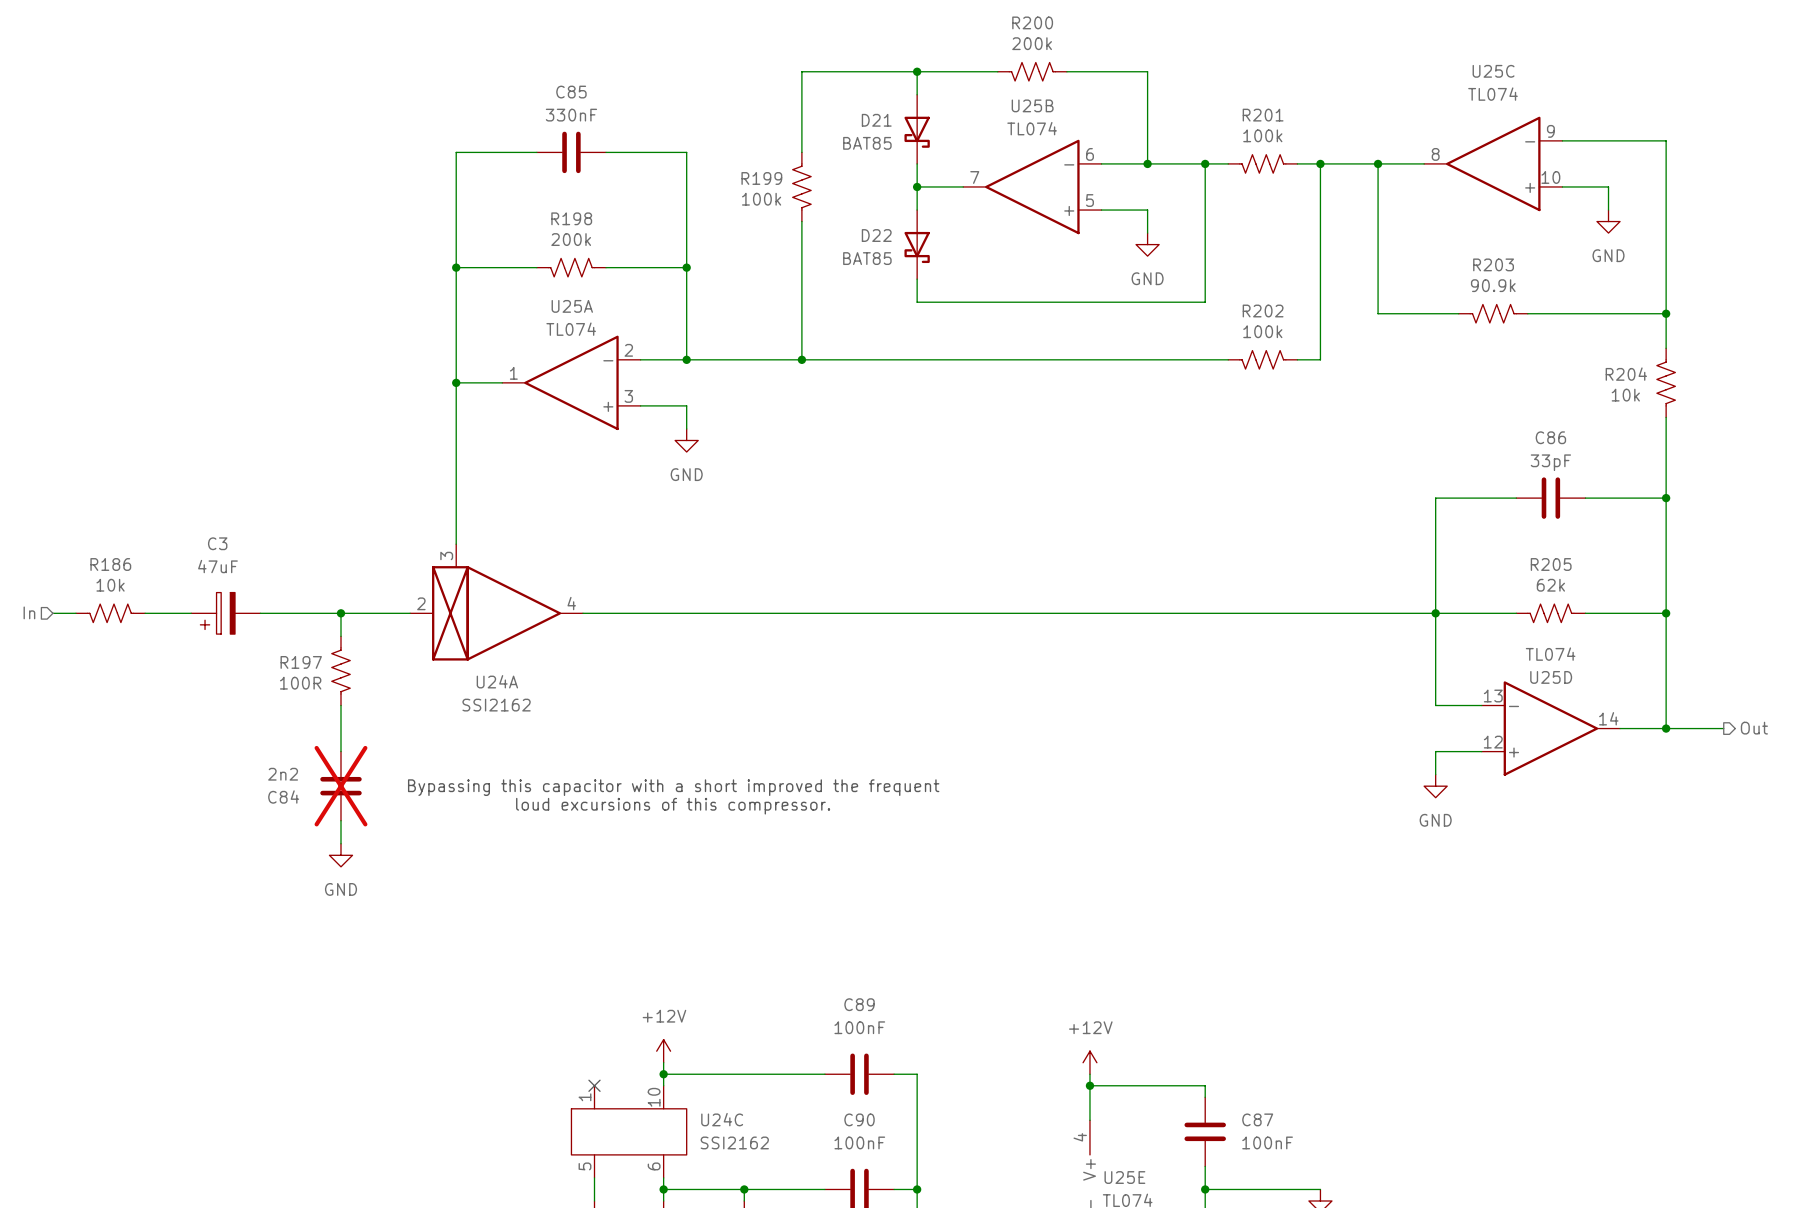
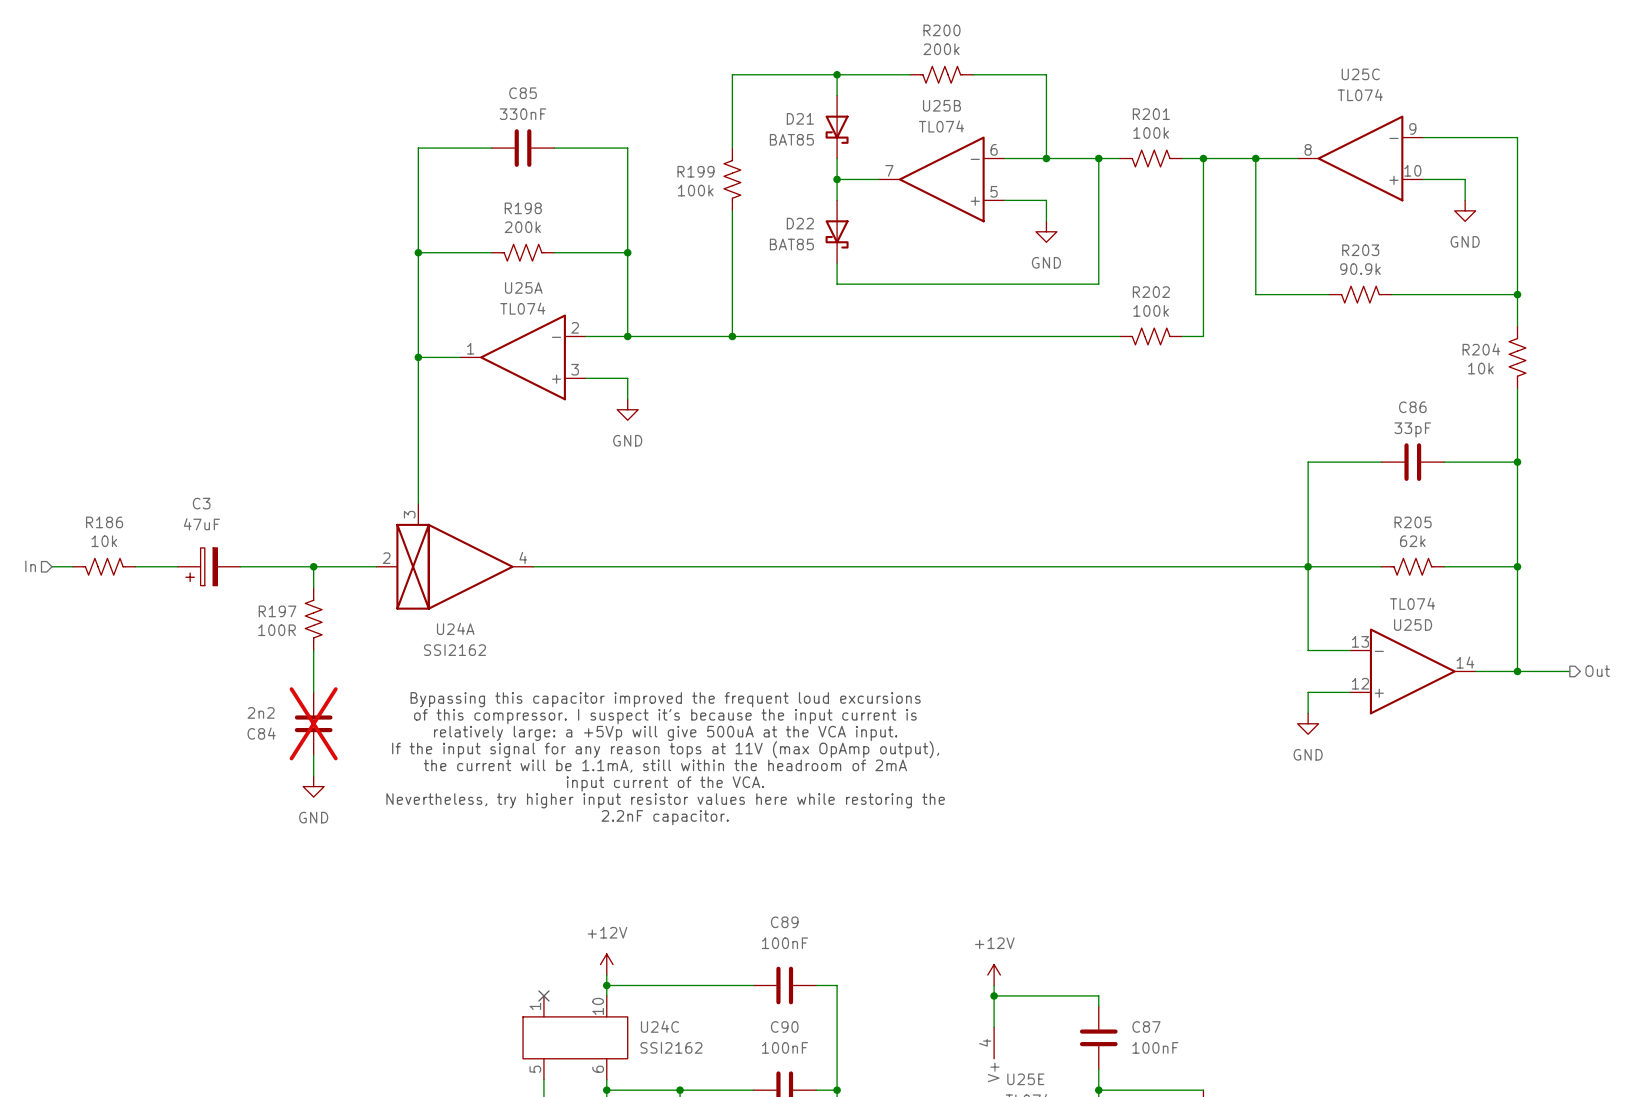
text: none -> Bypassing this capacitor improved the frequent loud excursions (665, 699)
text: none -> of this compressor. I suspect it's because the input current is (665, 716)
text: Bypassing this capacitor with a short improved the frequent (673, 787) -> none
text: none -> relatively large: a +5Vp will give 500uA at the VCA input. (665, 733)
text: loud excursions of this compressor. (673, 806) -> none
text: none -> If the input signal for any reason tops at 11V (max OpAmp output), (665, 749)
text: none -> the current will be 1.1mA, still within the headroom of 2mA (665, 766)
text: none -> input current of the VCA. (665, 783)
text: none -> Nevertheless, try higher input resistor values here while restoring the (665, 800)
text: none -> 2.2nF capacitor. (665, 817)

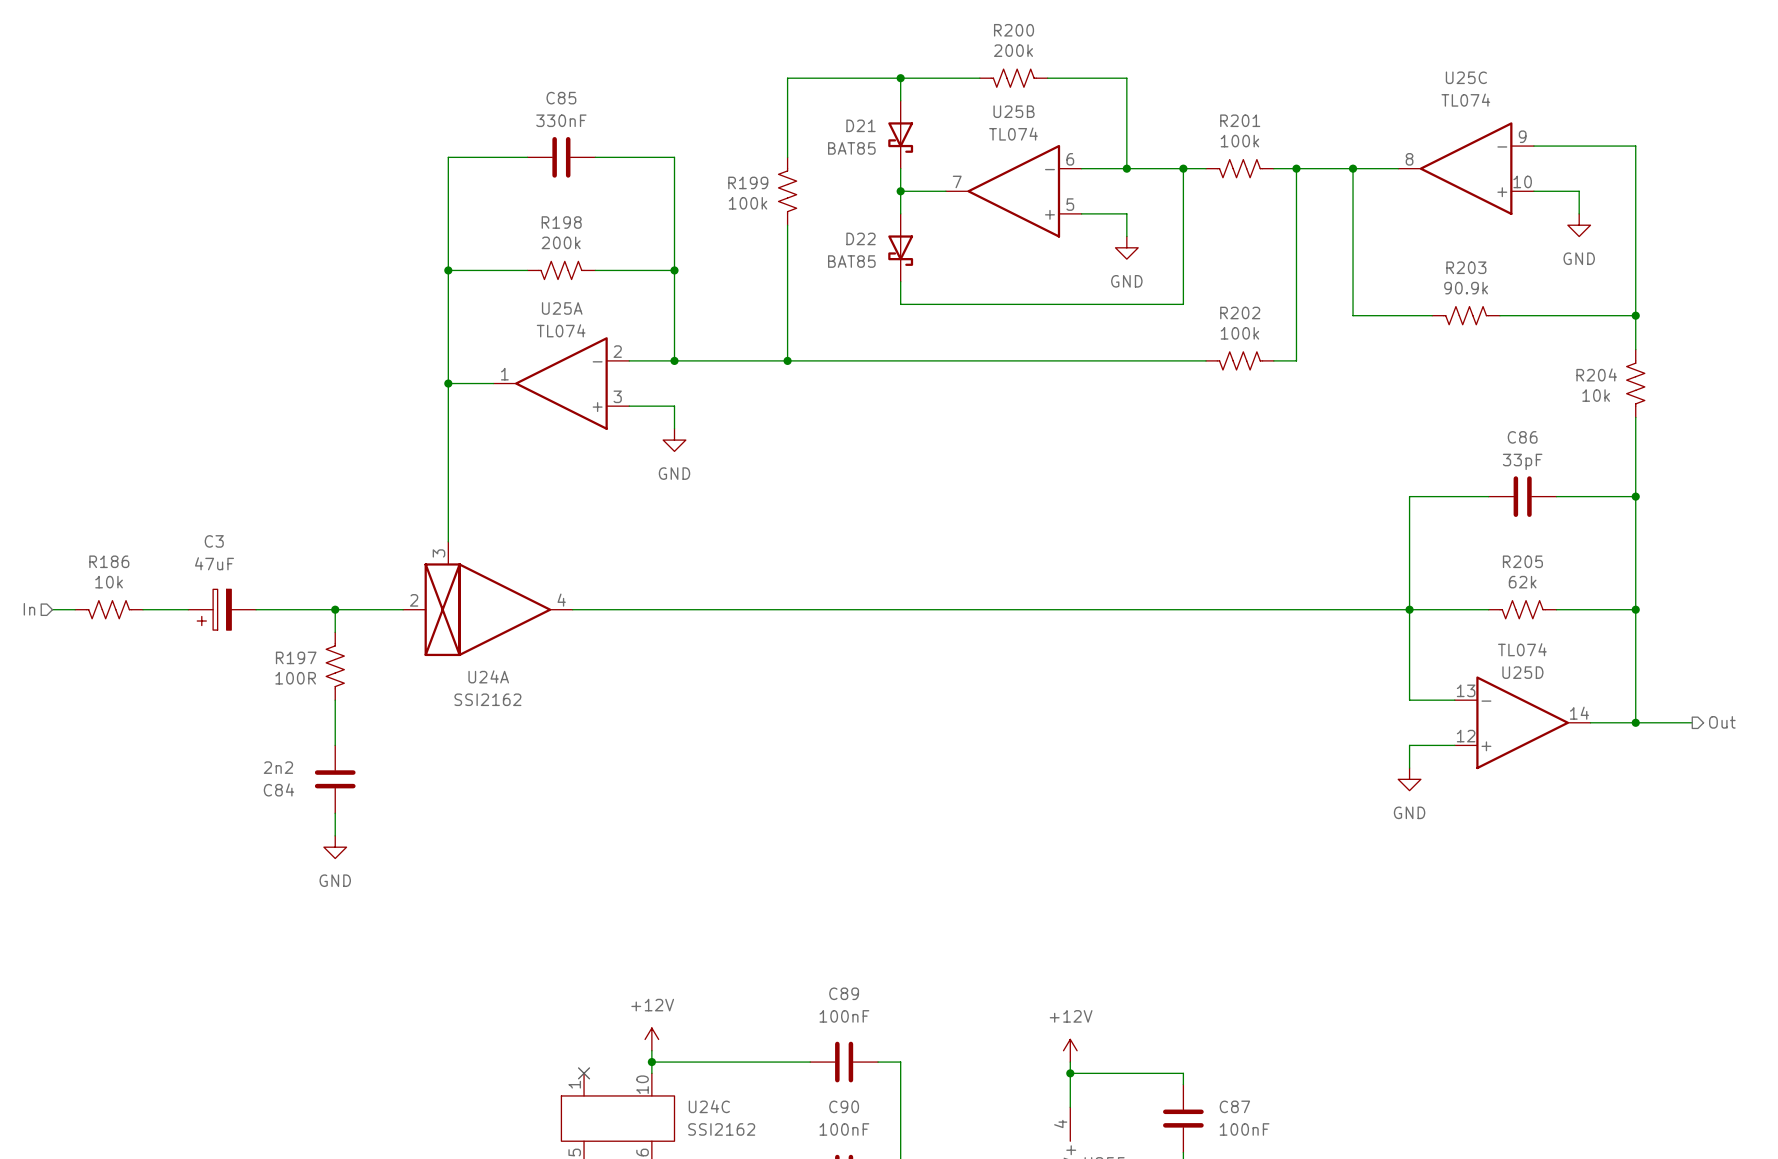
text: Bypassing this capacitor improved the frequent loud excursions (665, 699) -> none
text: of this compressor. I suspect it's because the input current is (665, 716) -> none
C84 do-not-place cross: (313, 723) -> none
text: relatively large: a +5Vp will give 500uA at the VCA input. (665, 733) -> none
text: If the input signal for any reason tops at 11V (max OpAmp output), (665, 749) -> none
text: the current will be 1.1mA, still within the headroom of 2mA (665, 766) -> none
text: input current of the VCA. (665, 783) -> none
text: Nevertheless, try higher input resistor values here while restoring the (665, 800) -> none
text: 2.2nF capacitor. (665, 817) -> none

